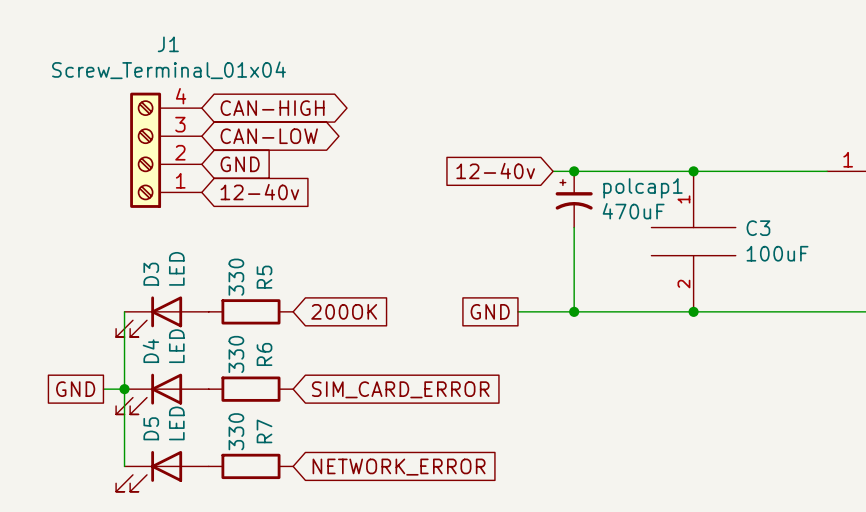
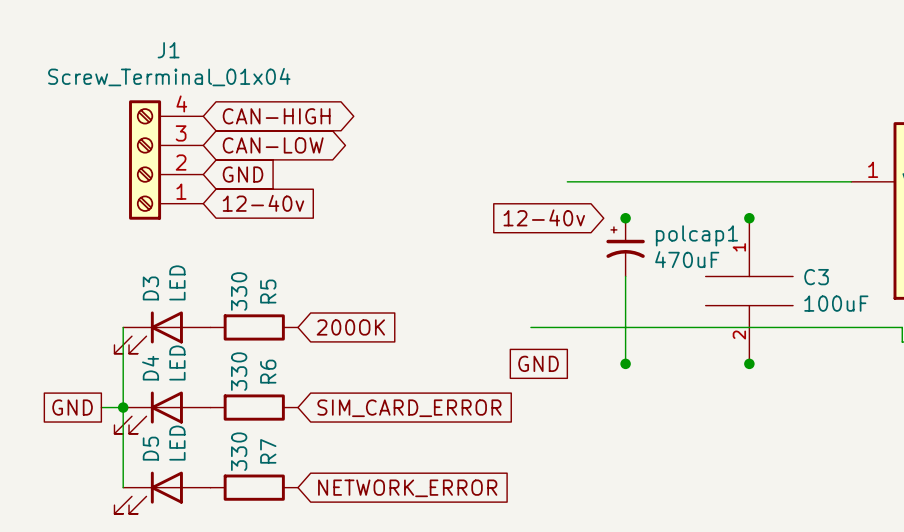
global label position: 12-40v (495, 171) -> 12-40v (544, 217)
junction: (574, 171) -> none
junction: (693, 171) -> none
polcap1 position: (574, 199) -> (625, 247)
junction: none -> (625, 218)
junction: none -> (749, 218)
wire: (574, 227) (574, 311) -> (625, 276) (625, 363)
C3 position: (693, 241) -> (749, 291)
global label position: GND (490, 311) -> GND (538, 363)
junction: (574, 311) -> none
junction: (693, 311) -> none
junction: none -> (625, 363)
junction: none -> (749, 363)

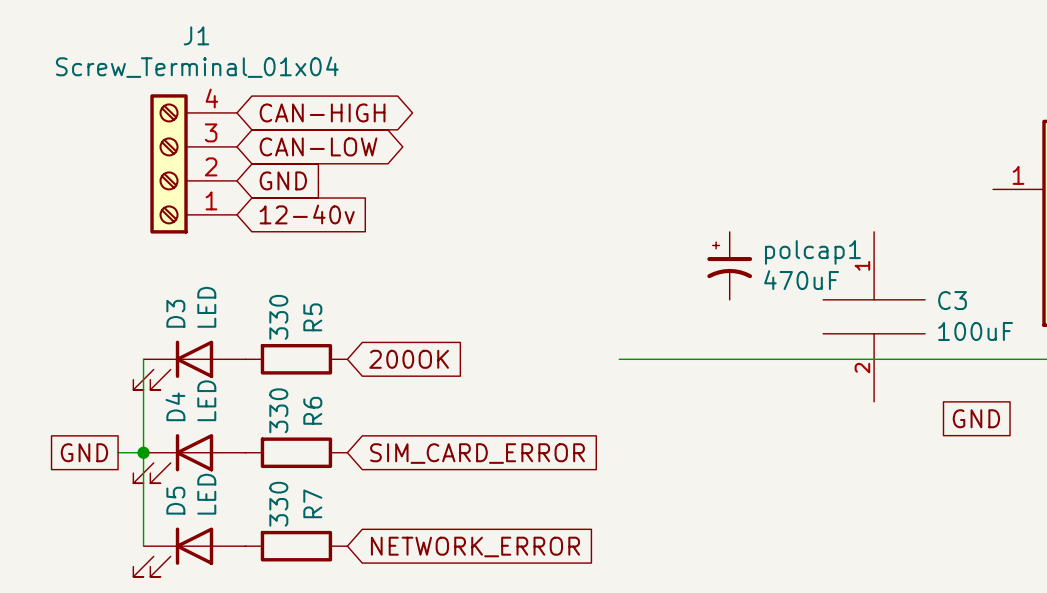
wire: (567, 181) (851, 181) -> none
global label: 12-40v (544, 217) -> none
junction: (625, 218) -> none
junction: (749, 218) -> none
wire: (625, 276) (625, 363) -> none
global label: GND (538, 363) -> none
junction: (625, 363) -> none
junction: (749, 363) -> none
global label: none -> GND (976, 418)

